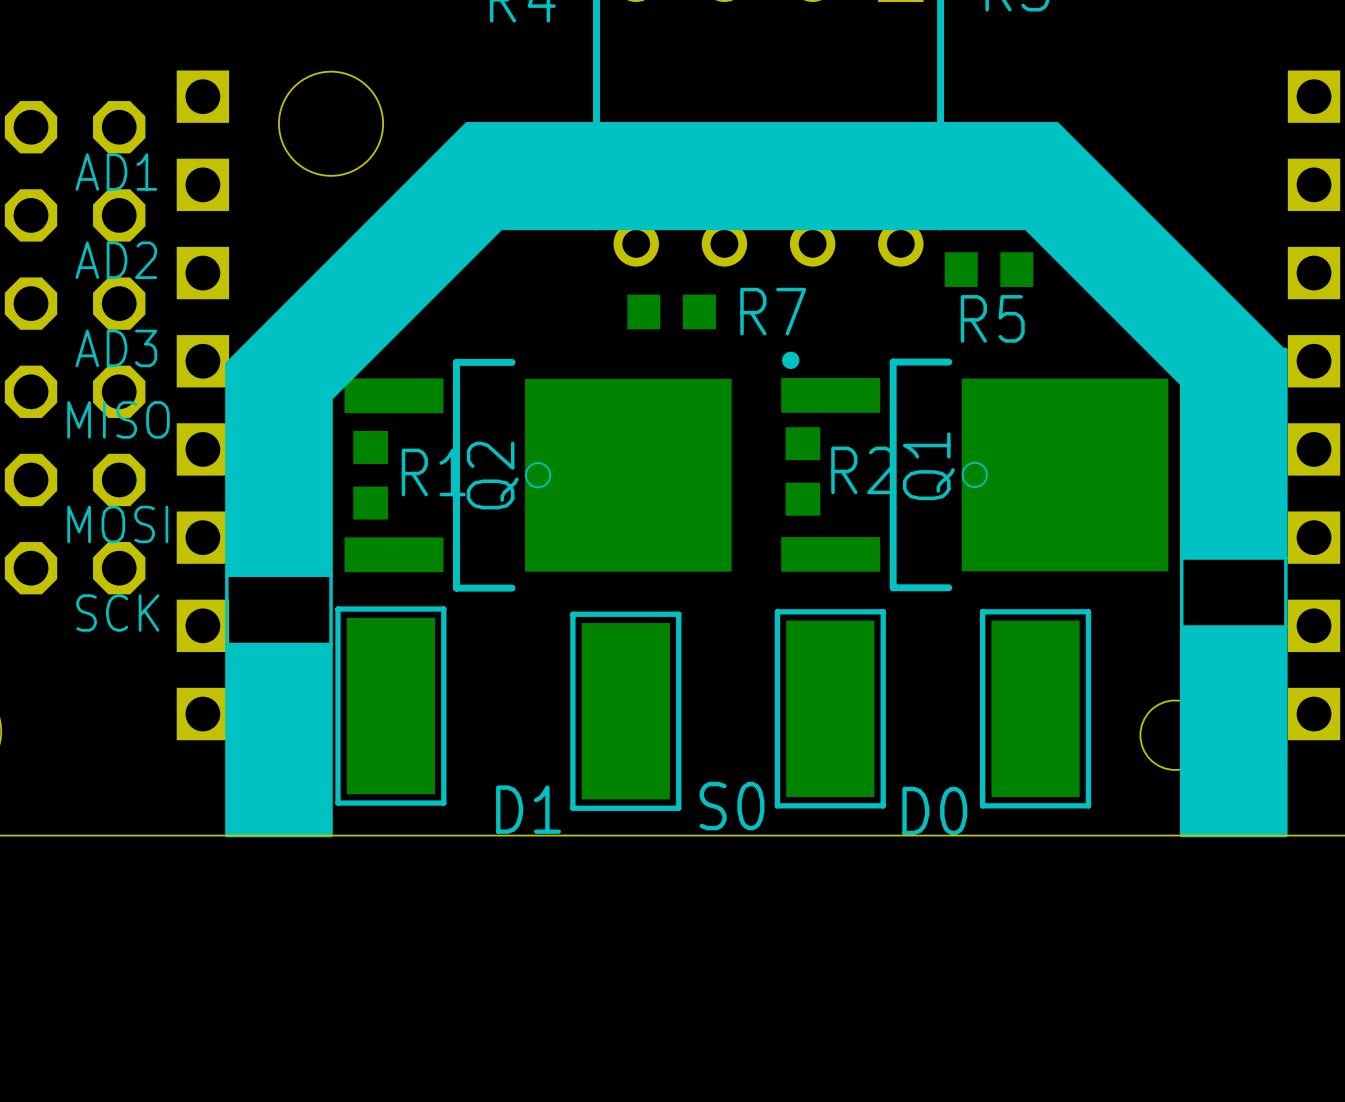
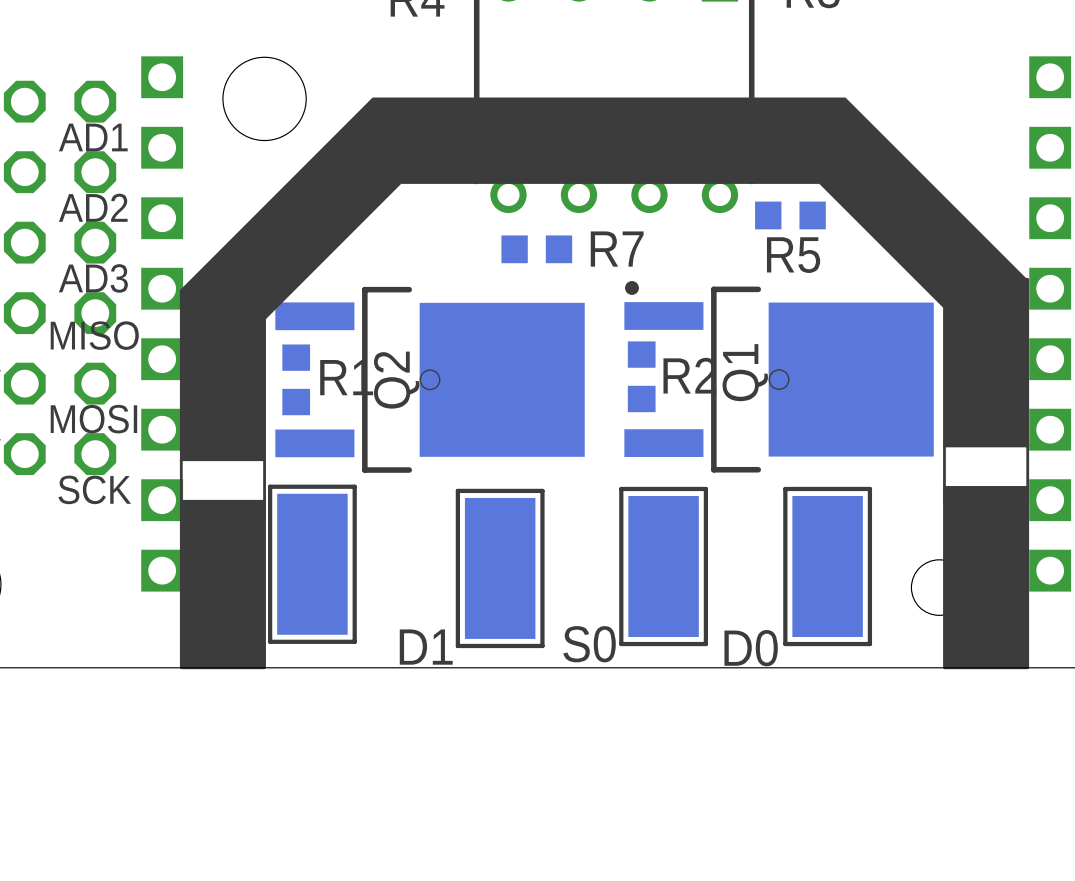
drawing shape: [1180, 625, 1288, 838] -> [943, 486, 1030, 670]
drawing shape: [225, 642, 333, 838] -> [179, 499, 266, 670]

